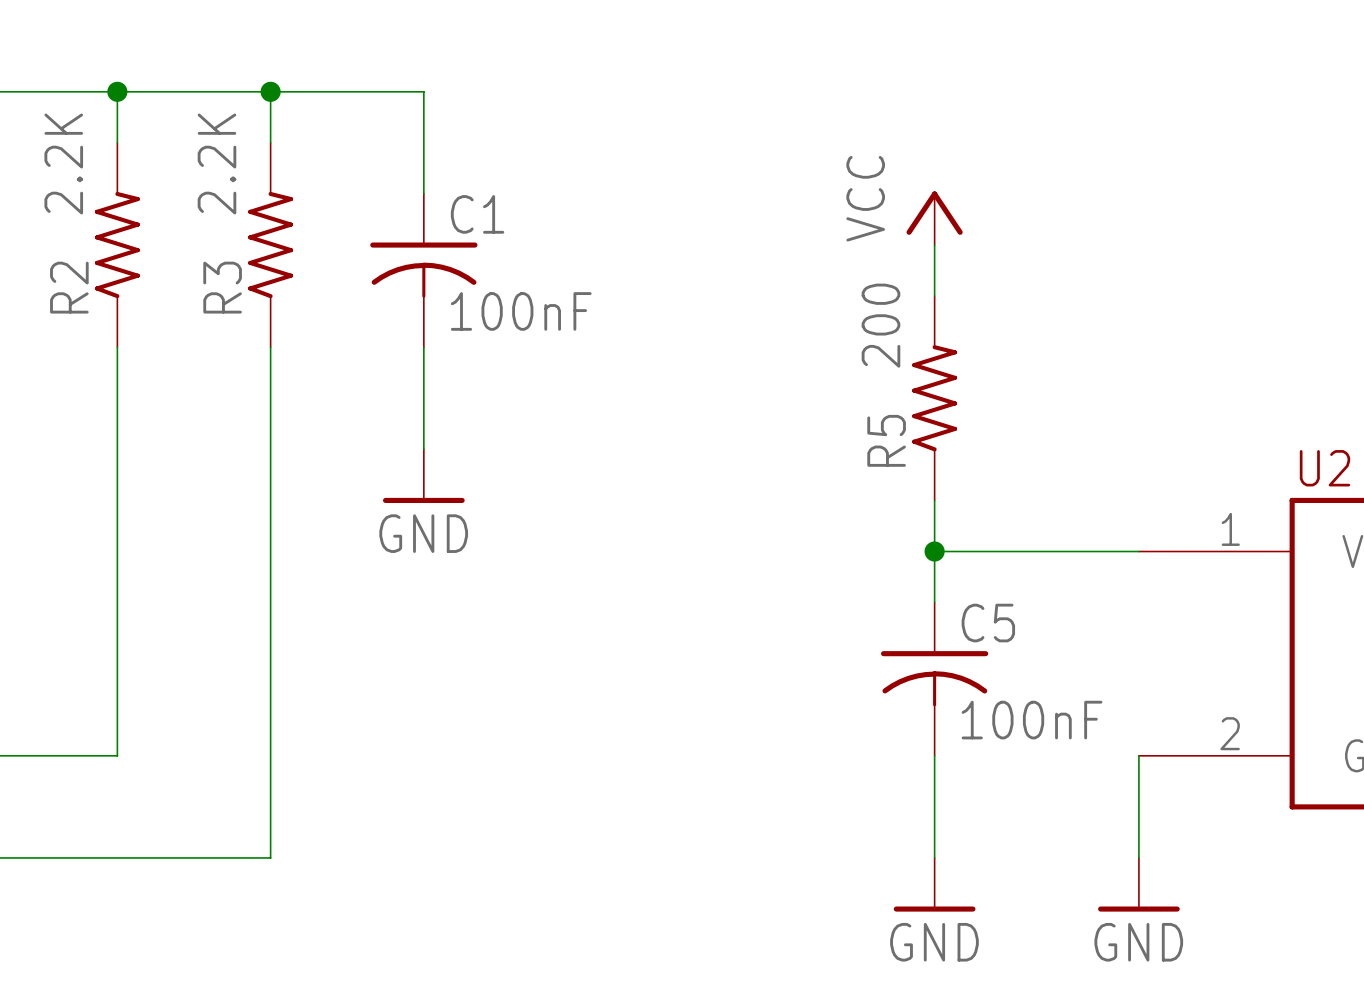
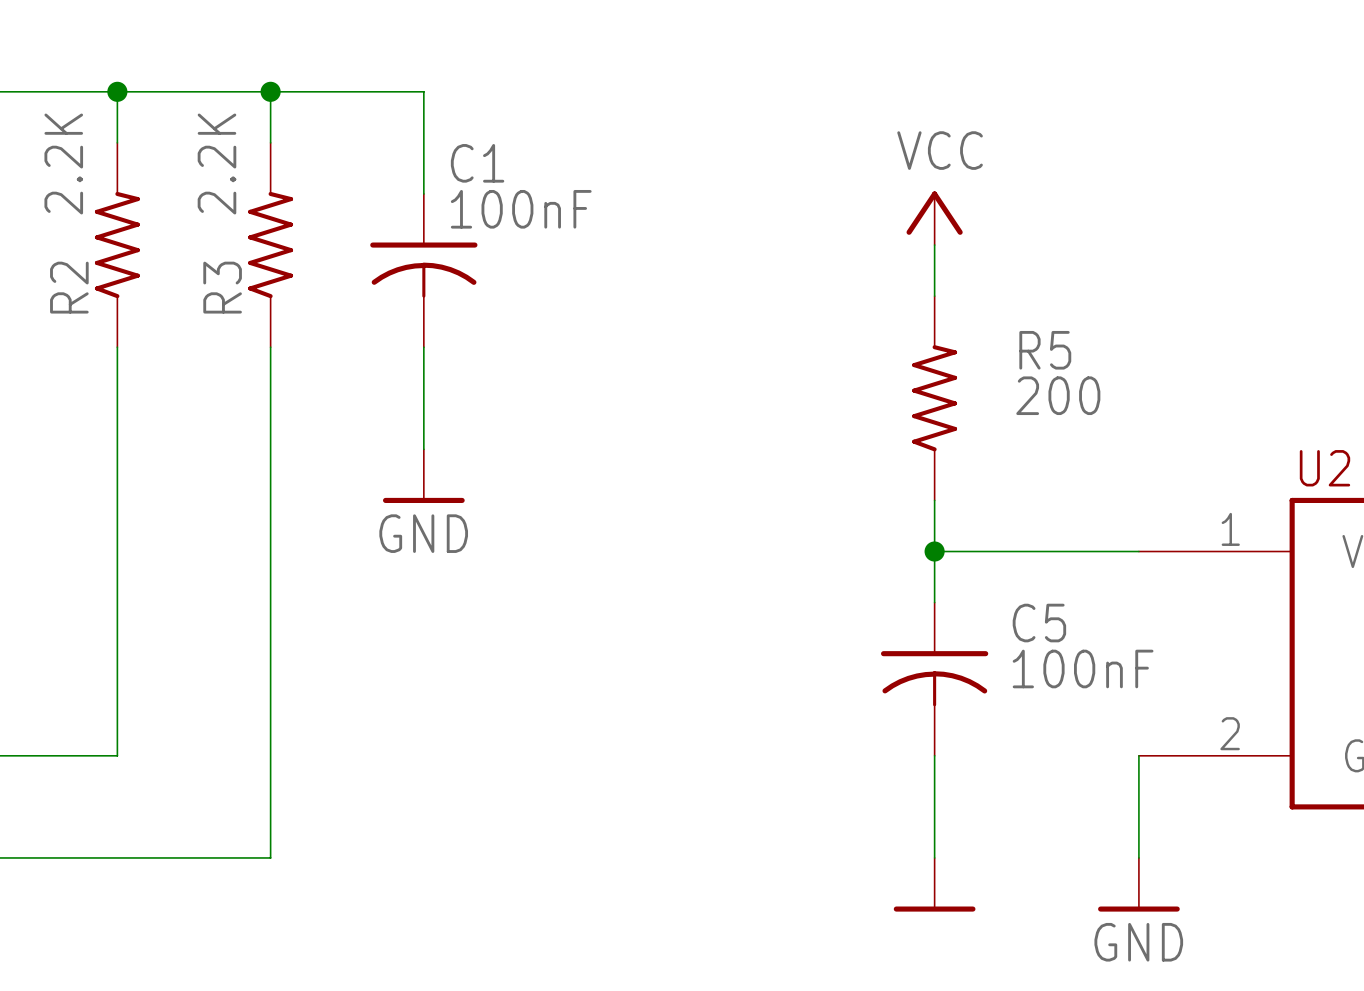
power symbol text rotation: 0° (865, 198) -> 90° clockwise (940, 150)
C1 name position: C1 (477, 214) -> C1 (477, 163)
C1 value position: 100nF (521, 311) -> 100nF (521, 209)
R5 value rotation: 0° (880, 325) -> 90° clockwise (1058, 395)
R5 value position: 200 (880, 325) -> 200 (1058, 395)
R5 name rotation: 0° (886, 440) -> 90° clockwise (1045, 350)
R5 name position: R5 (886, 440) -> R5 (1045, 350)
C5 name position: C5 (988, 623) -> C5 (1039, 623)
C5 value position: 100nF (1032, 720) -> 100nF (1083, 668)
power symbol text: GND (934, 942) -> none

